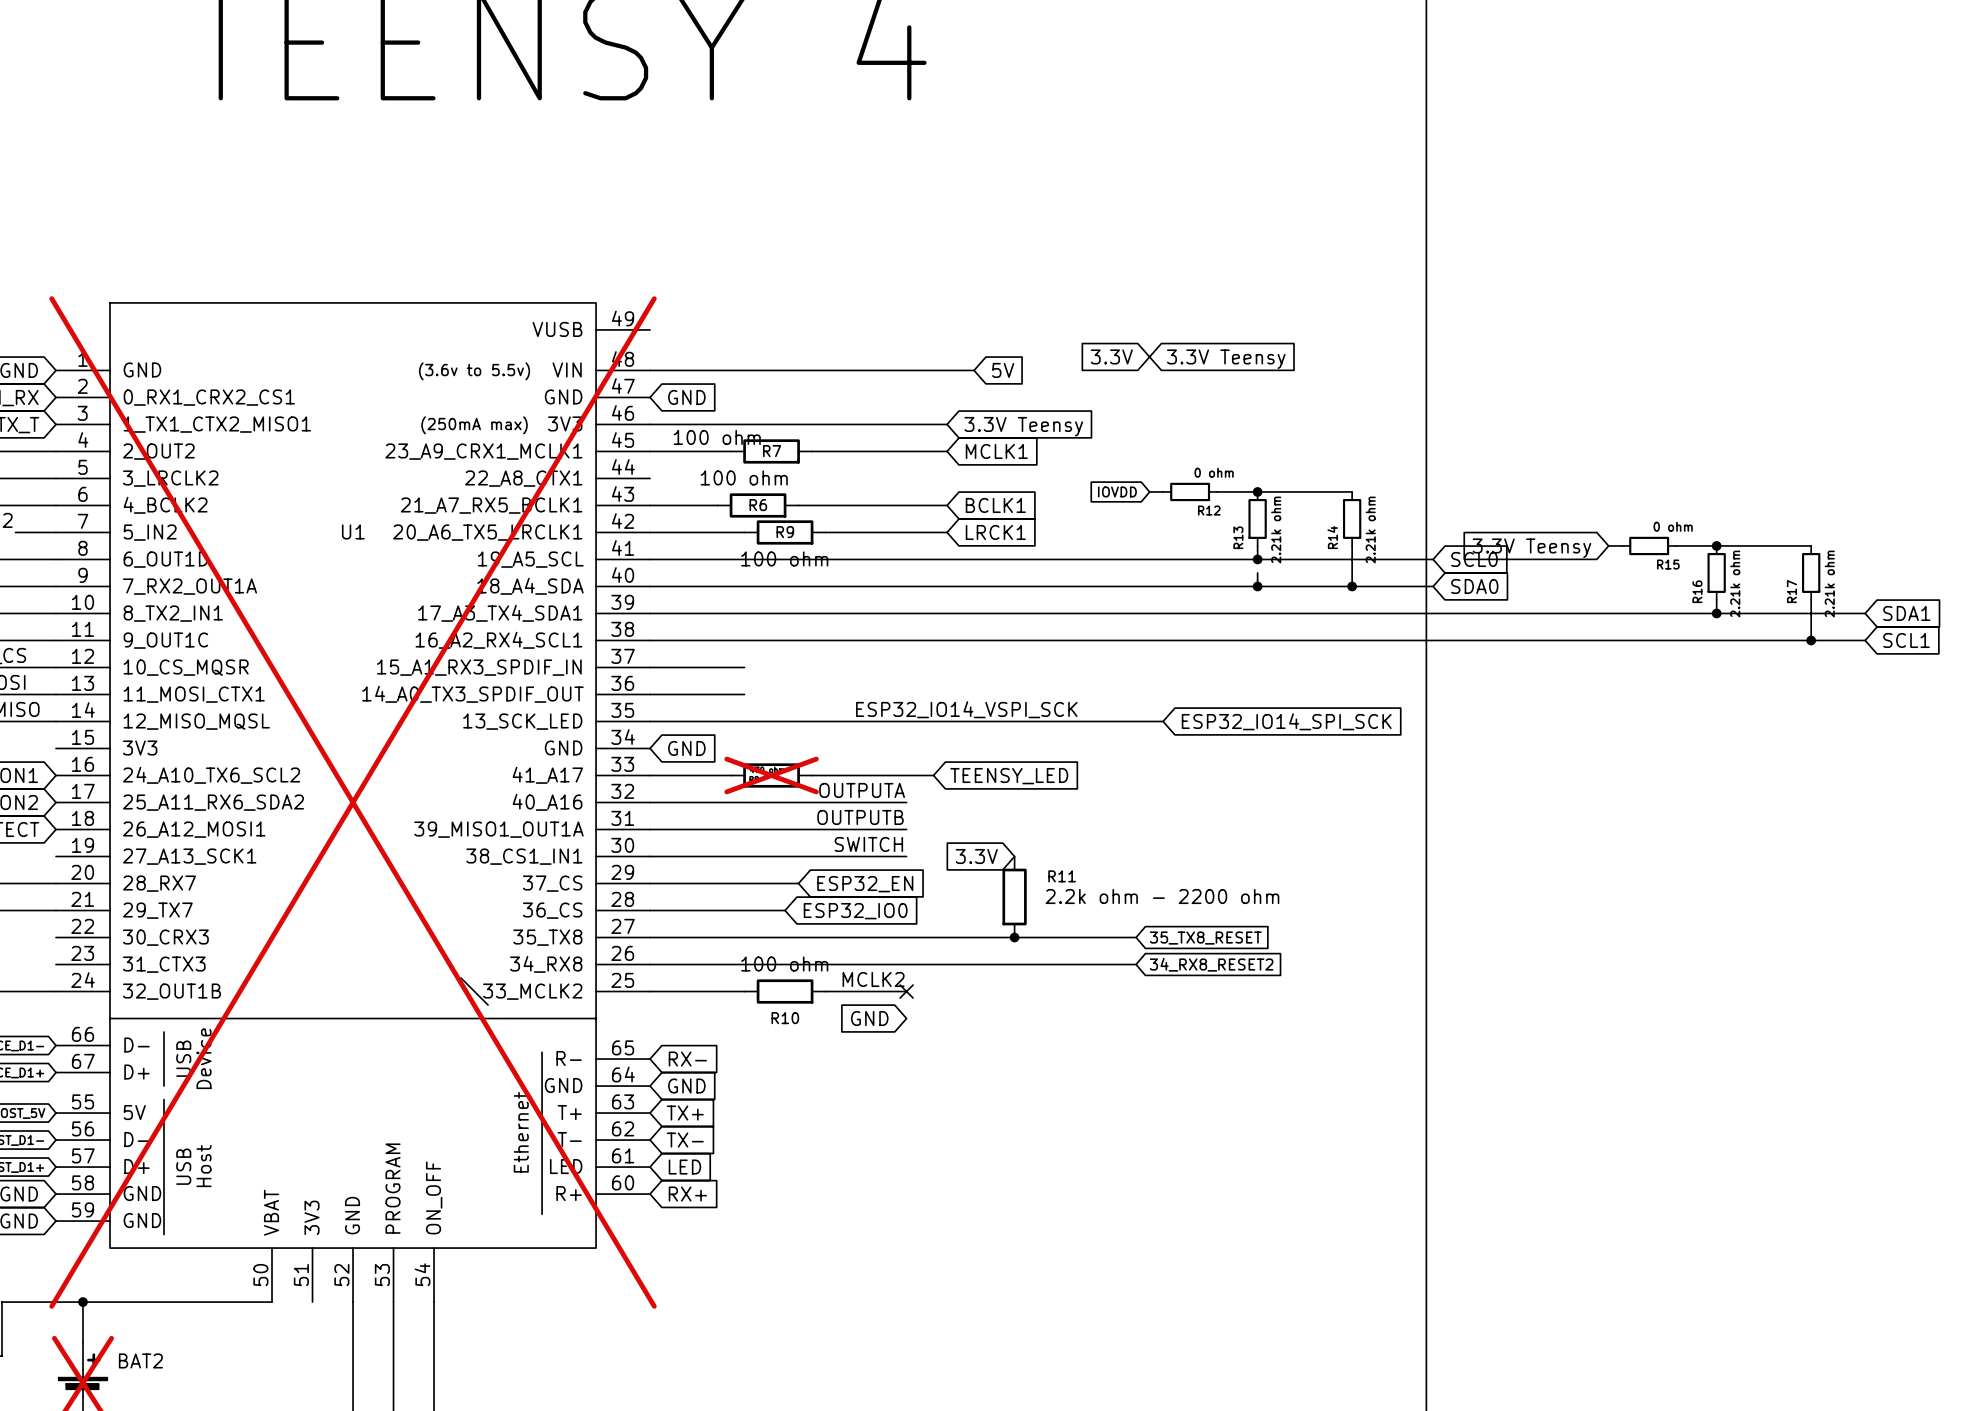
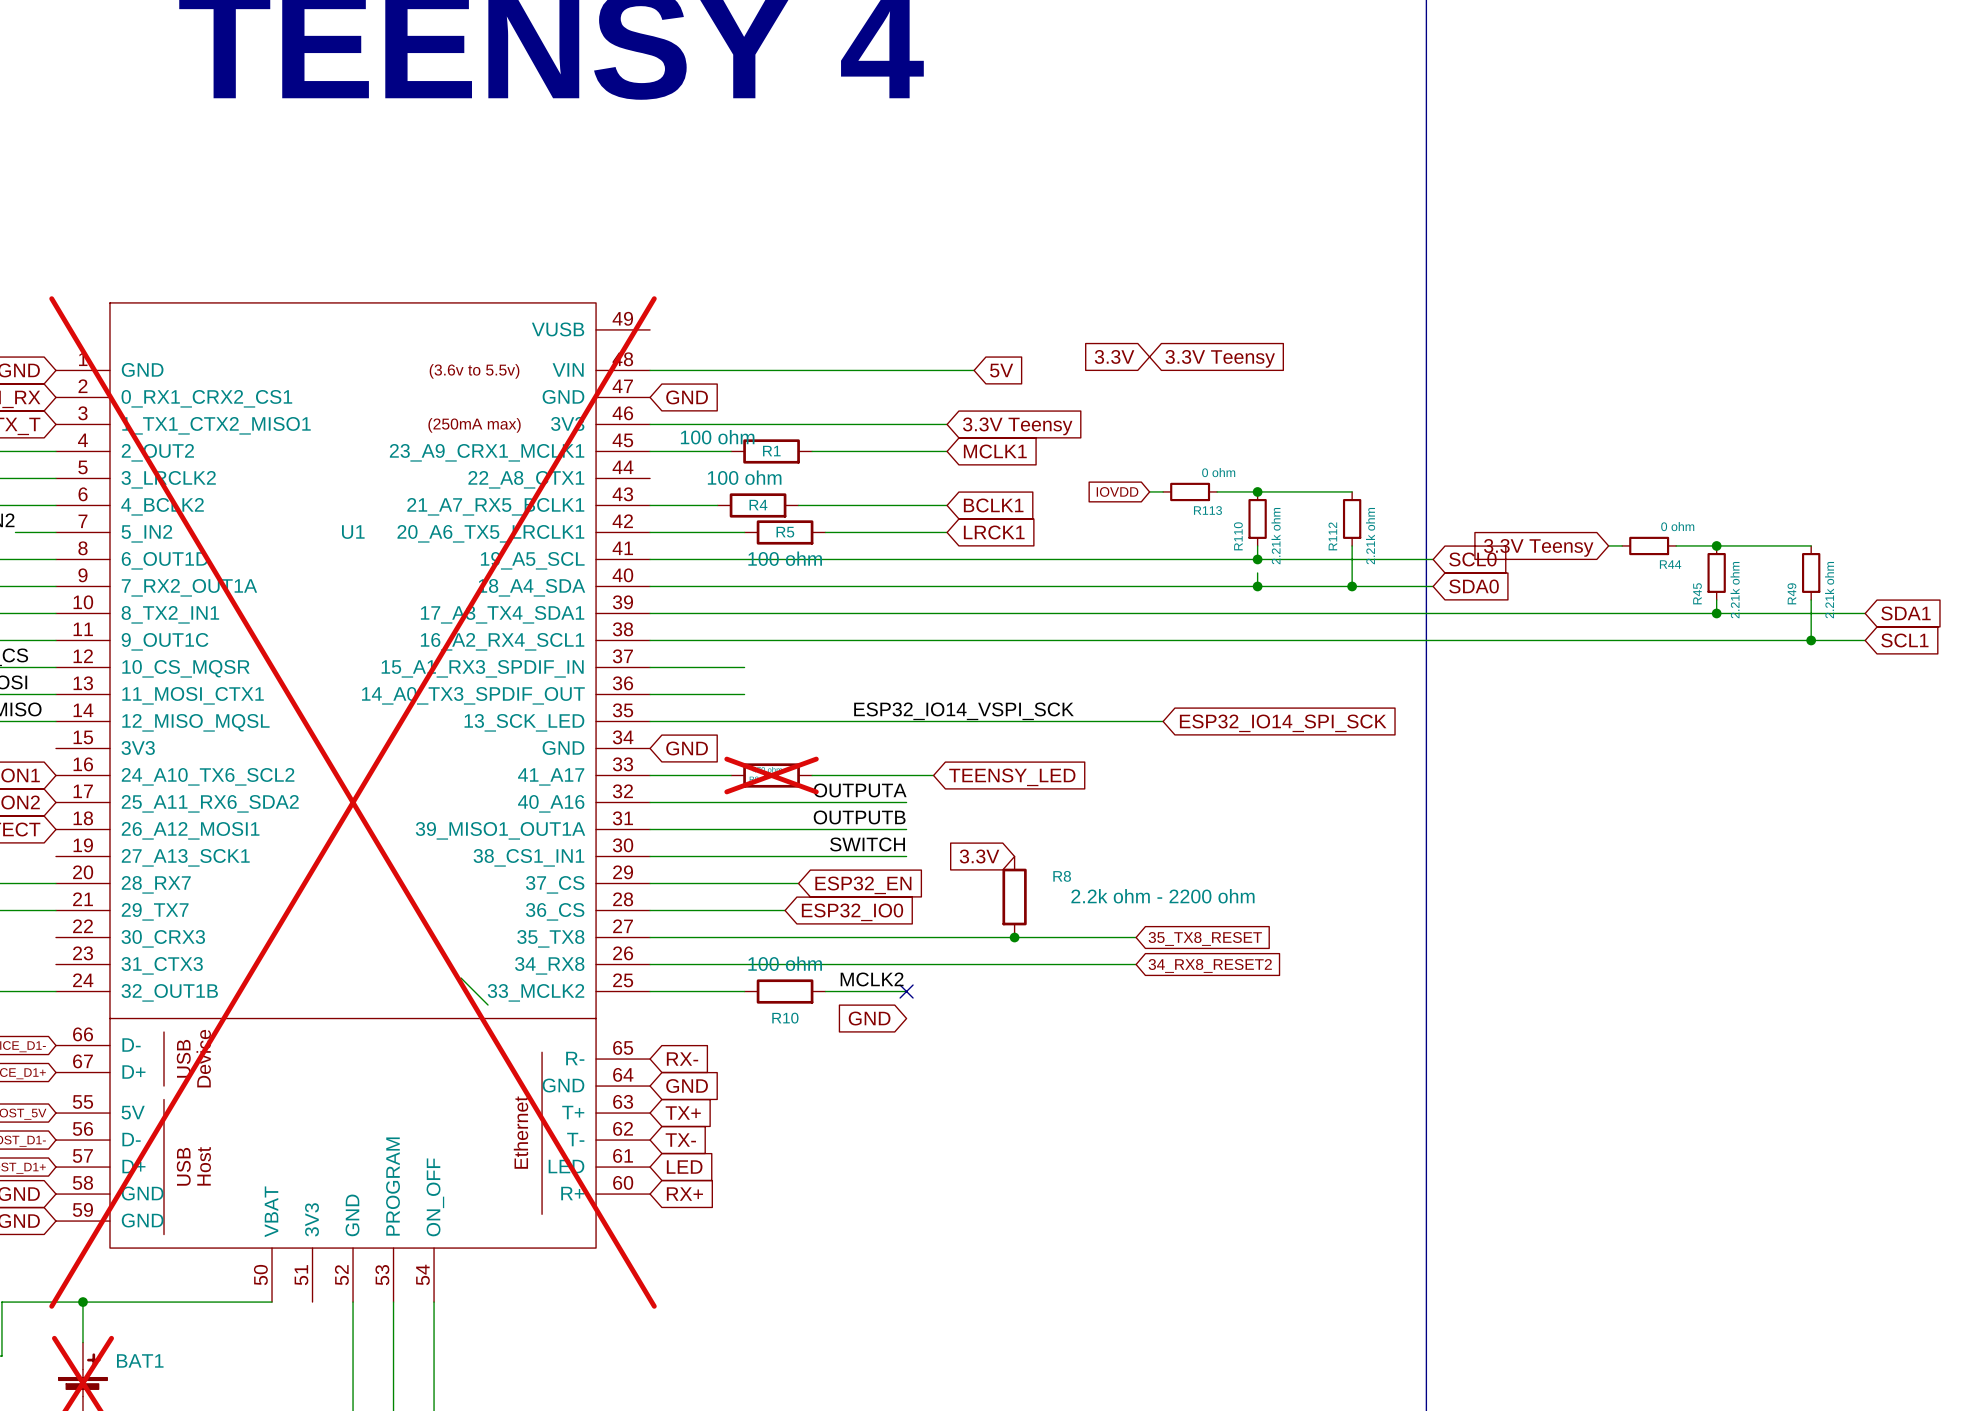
R7 name: R7 (772, 451) -> R1 (771, 451)
R6 name: R6 (758, 505) -> R4 (758, 505)
R12 name: R12 (1209, 510) -> R113 (1207, 510)
R9 name: R9 (785, 532) -> R5 (785, 532)
R13 name: R13 (1238, 537) -> R110 (1238, 536)
R14 name: R14 (1332, 537) -> R112 (1332, 536)
R15 name: R15 (1668, 564) -> R44 (1670, 564)
R16 name: R16 (1697, 591) -> R45 (1697, 593)
R17 name: R17 (1791, 591) -> R49 (1791, 593)
R11 name: R11 (1062, 876) -> R8 (1062, 876)
BAT2 name: BAT2 (140, 1360) -> BAT1 (140, 1360)

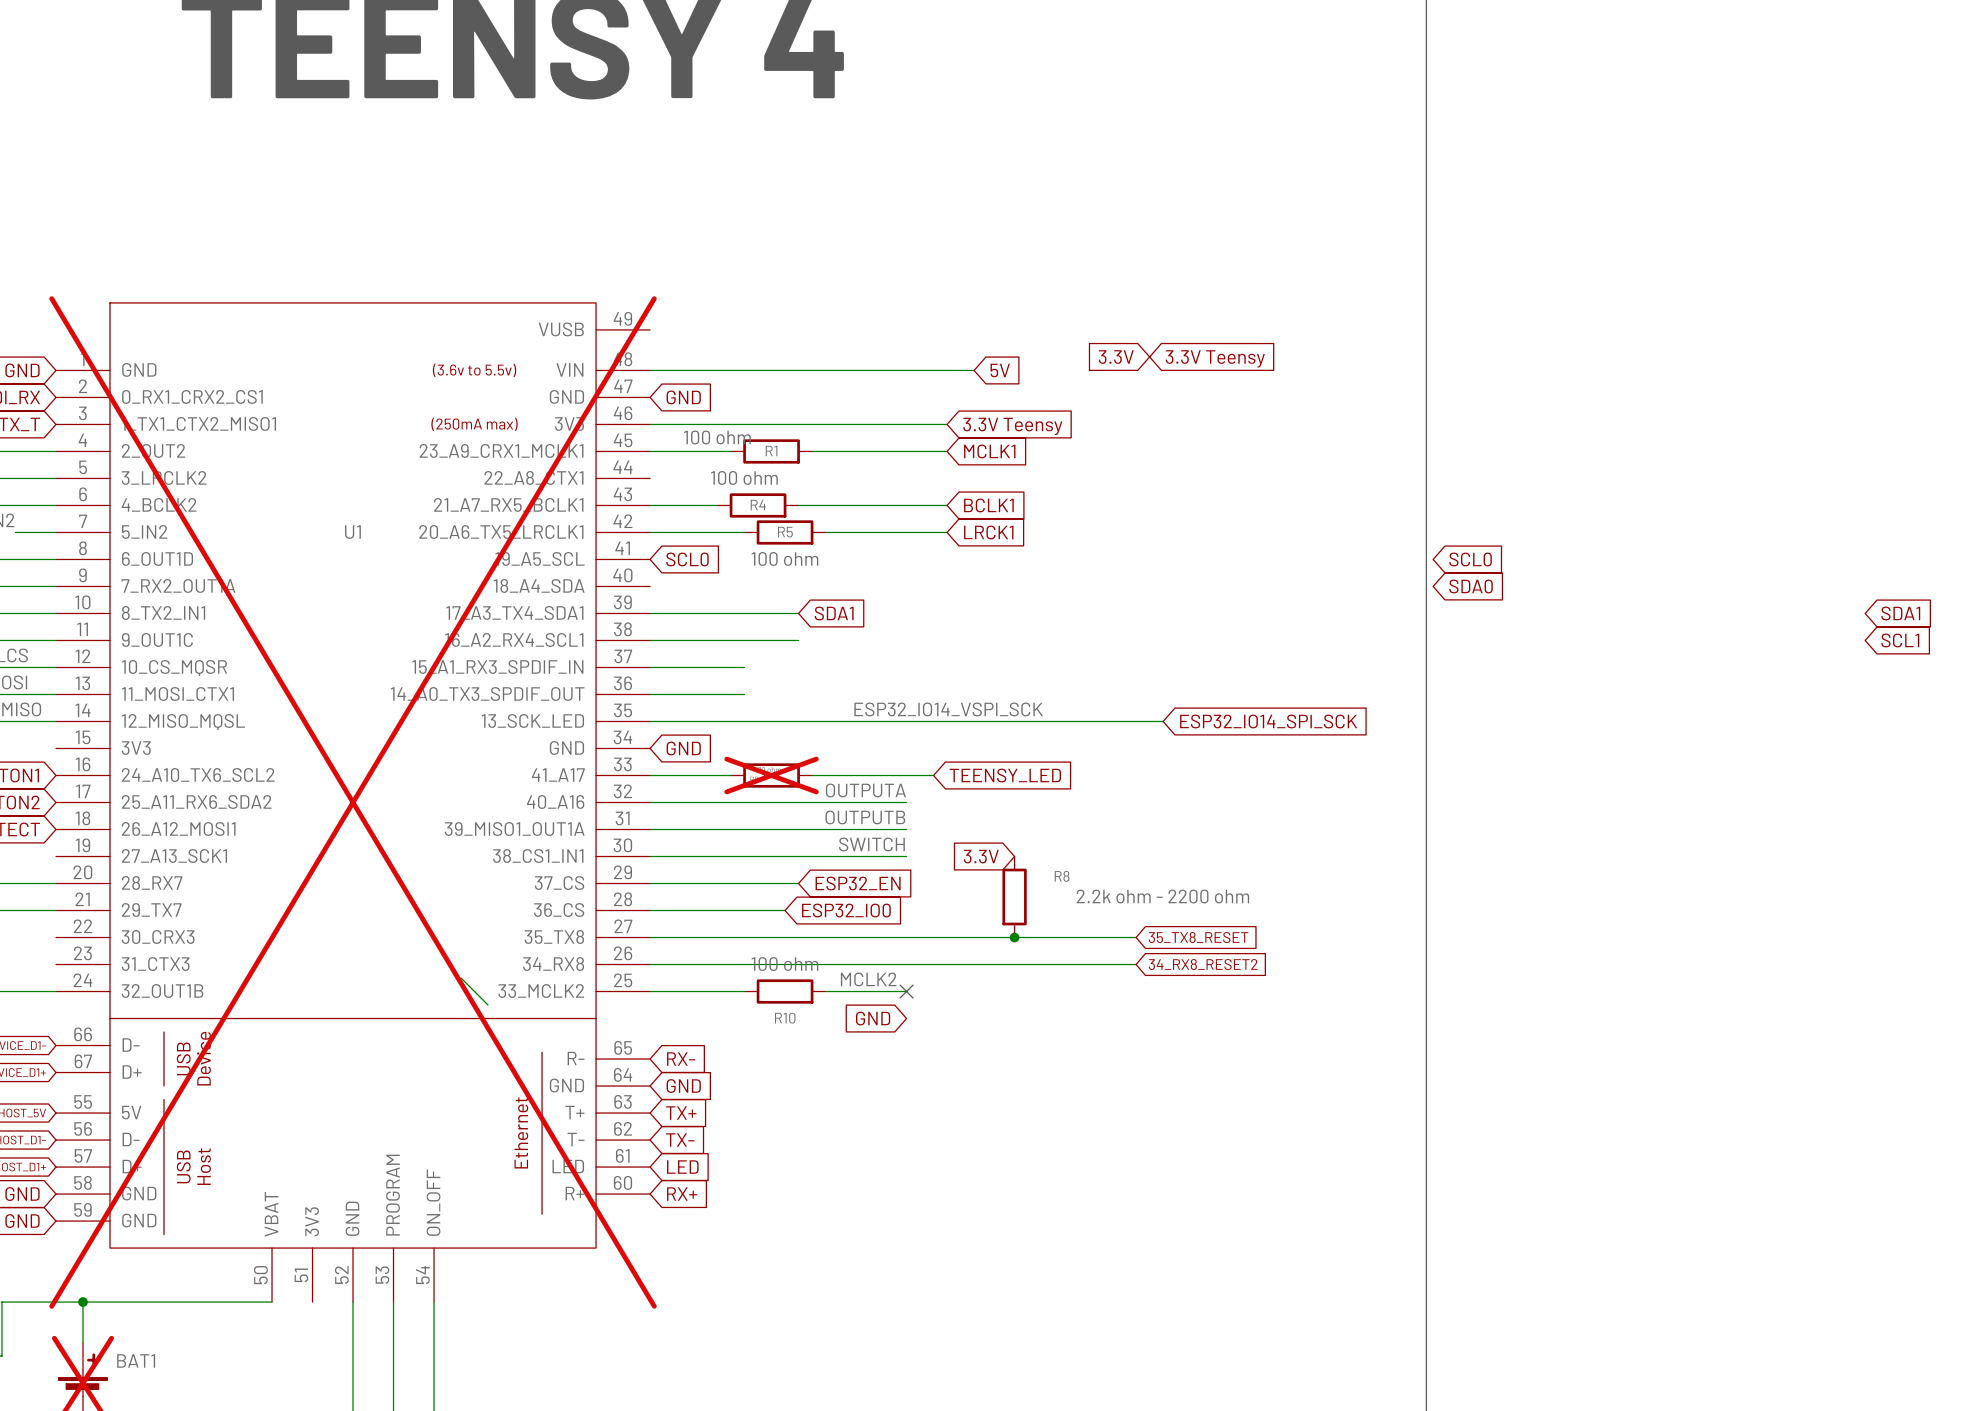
global label: IOVDD (1117, 491) -> none
wire: (1149, 491) (1163, 491) -> none
R113: 0 ohm (1190, 491) -> none
wire: (1217, 491) (1352, 491) -> none
junction: (1257, 491) -> none
R110: 2.21k ohm (1257, 518) -> none
R112: 2.21k ohm (1352, 518) -> none
wire: (1257, 545) (1257, 559) -> none
wire: (1352, 545) (1352, 586) -> none
wire: (1608, 545) (1622, 545) -> none
R44: 0 ohm (1649, 545) -> none
wire: (1676, 545) (1811, 545) -> none
junction: (1716, 545) -> none
global label: 3.3V Teensy (1538, 547) -> none
wire: (650, 559) (1433, 559) -> none
global label: none -> SCL0 (687, 559)
junction: (1257, 559) -> none
wire: (1257, 572) (1257, 586) -> none
R45: 2.21k ohm (1716, 572) -> none
R49: 2.21k ohm (1811, 572) -> none
wire: (650, 586) (1433, 586) -> none
junction: (1257, 586) -> none
junction: (1352, 586) -> none
wire: (1716, 599) (1716, 613) -> none
wire: (1811, 599) (1811, 640) -> none
wire: (798, 613) (1865, 613) -> none
global label: none -> SDA1 (834, 613)
junction: (1716, 613) -> none
wire: (798, 640) (1865, 640) -> none
junction: (1811, 640) -> none

